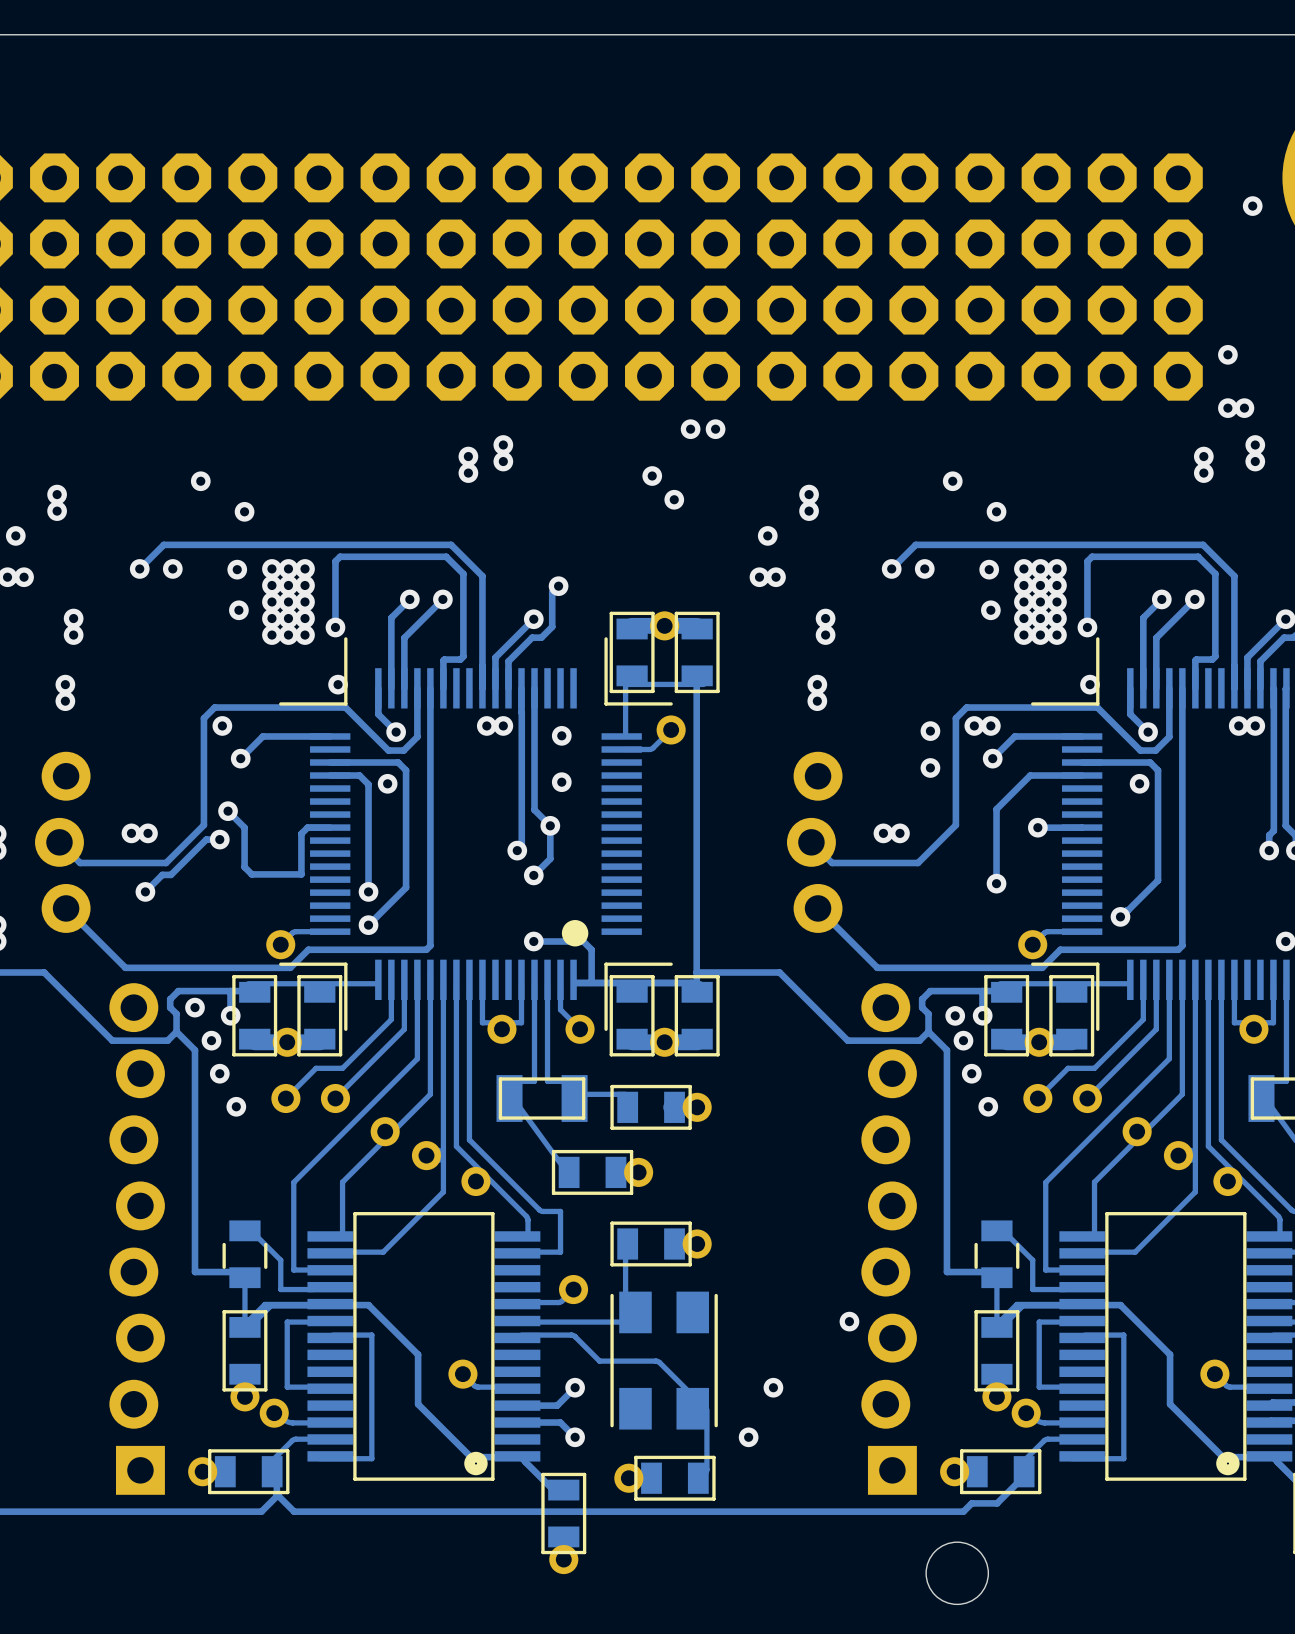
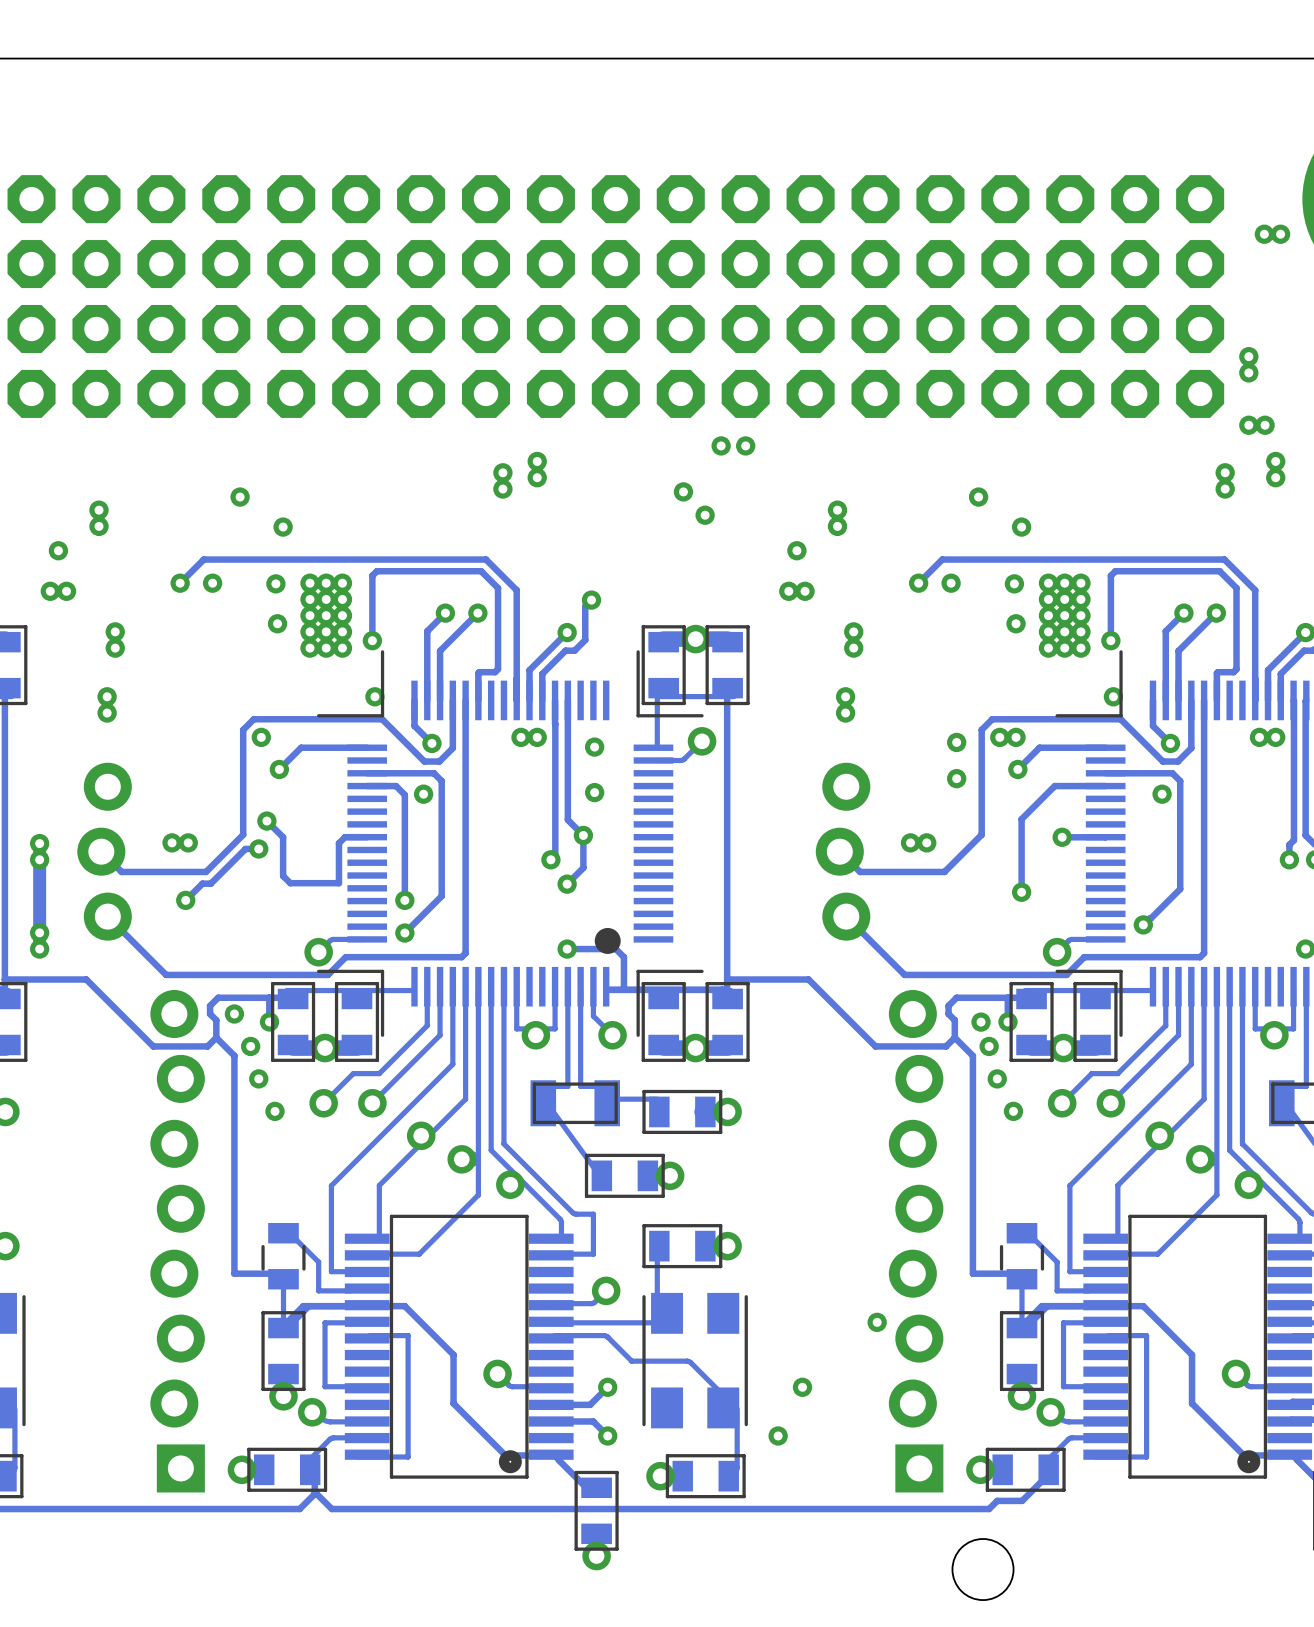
via: (1252, 206) -> none
via: none -> (1264, 234)
via: none -> (1280, 234)
via: none -> (1248, 356)

